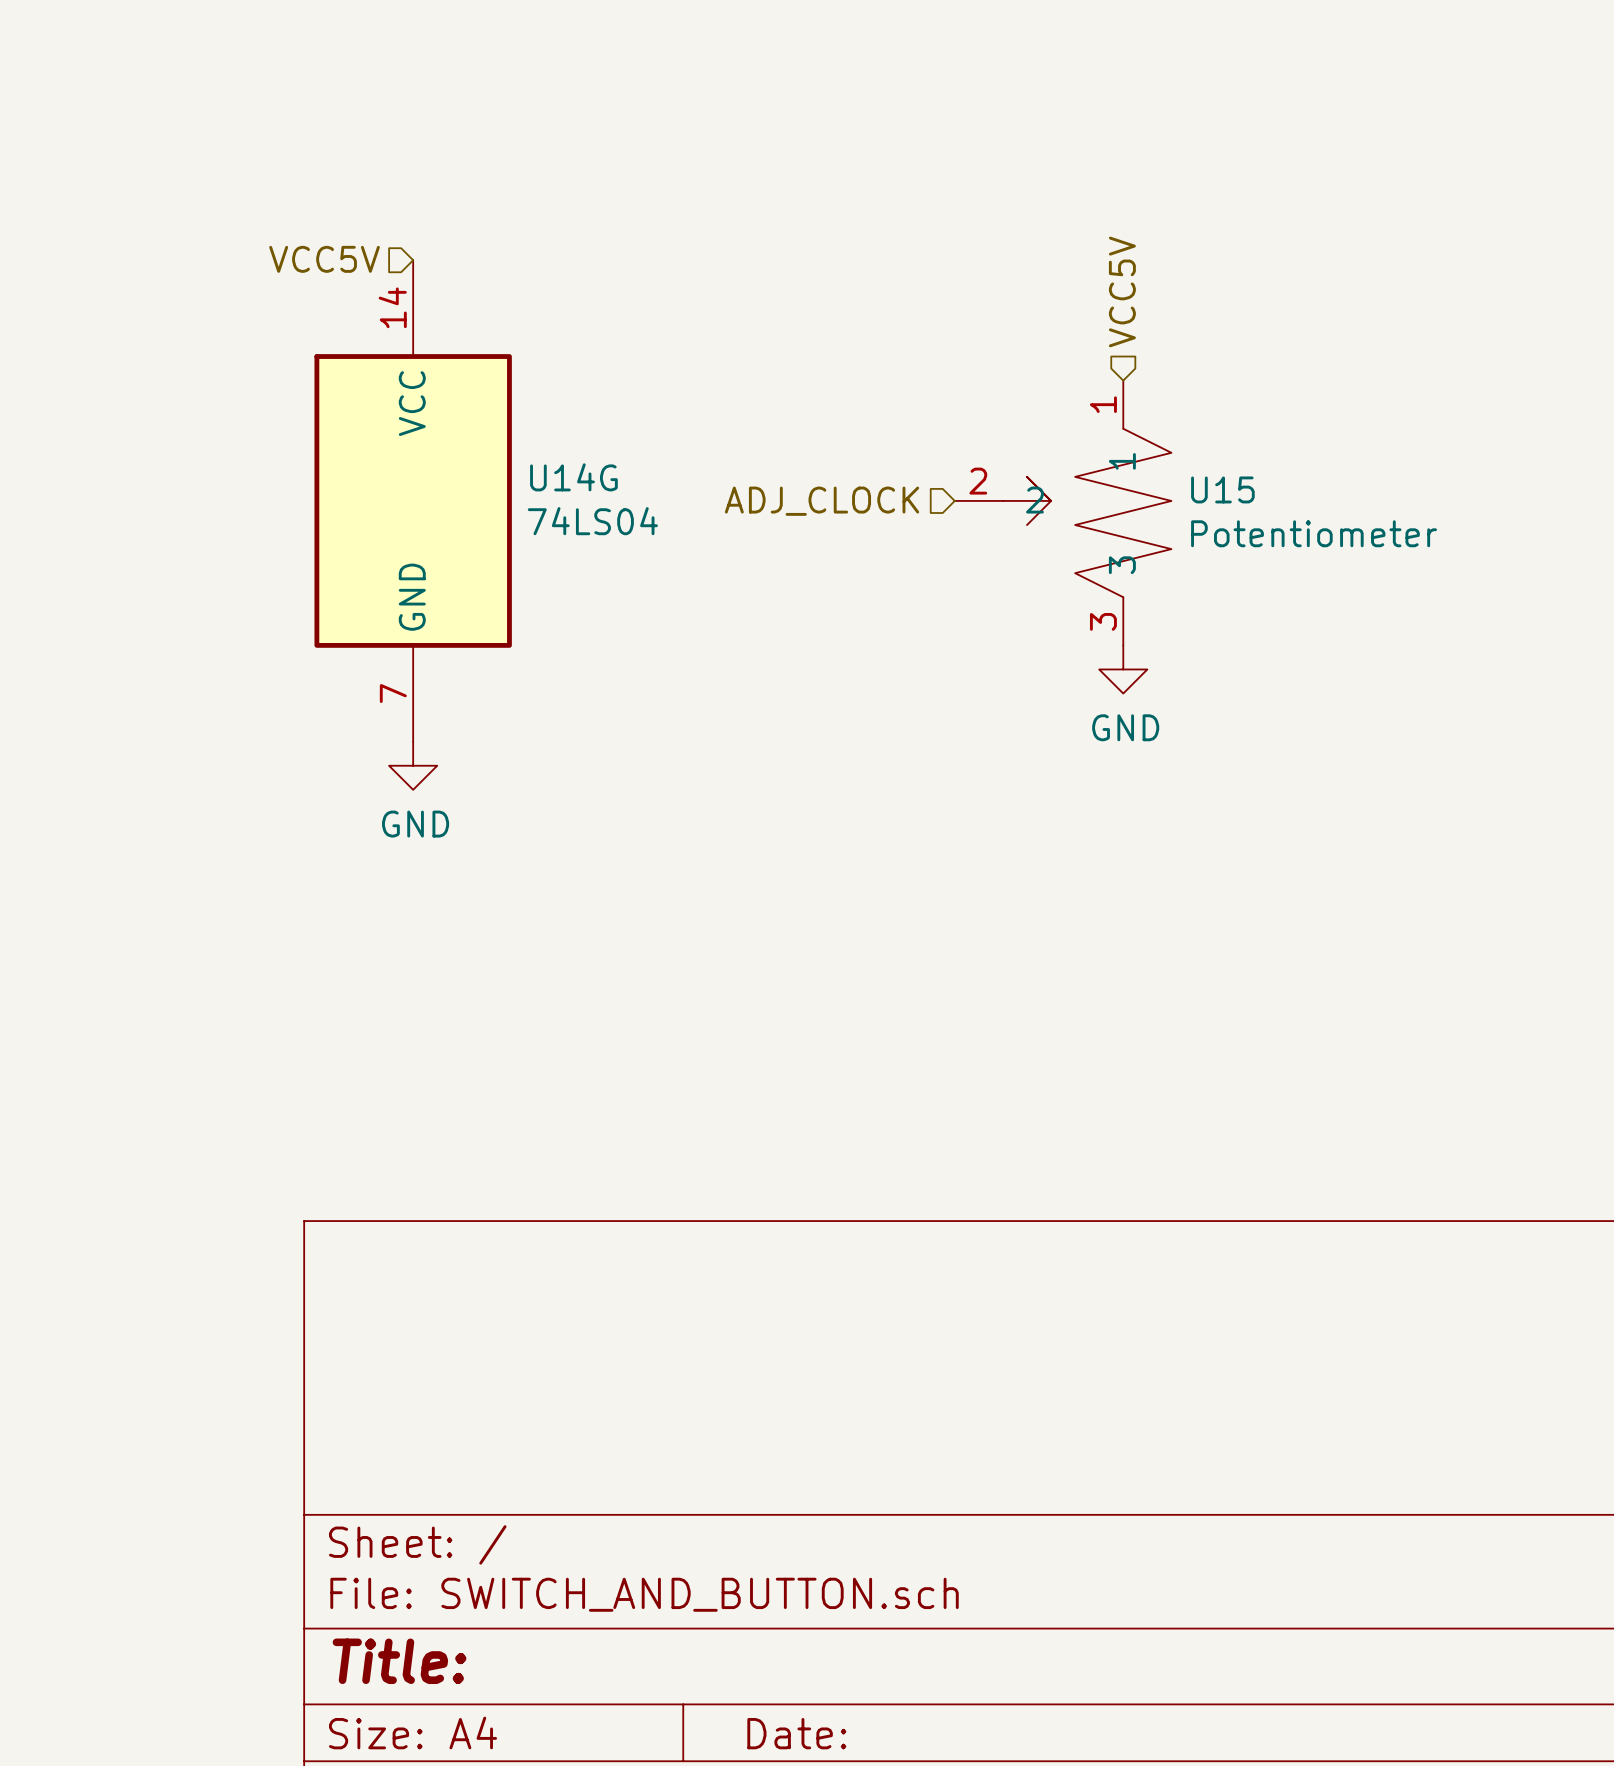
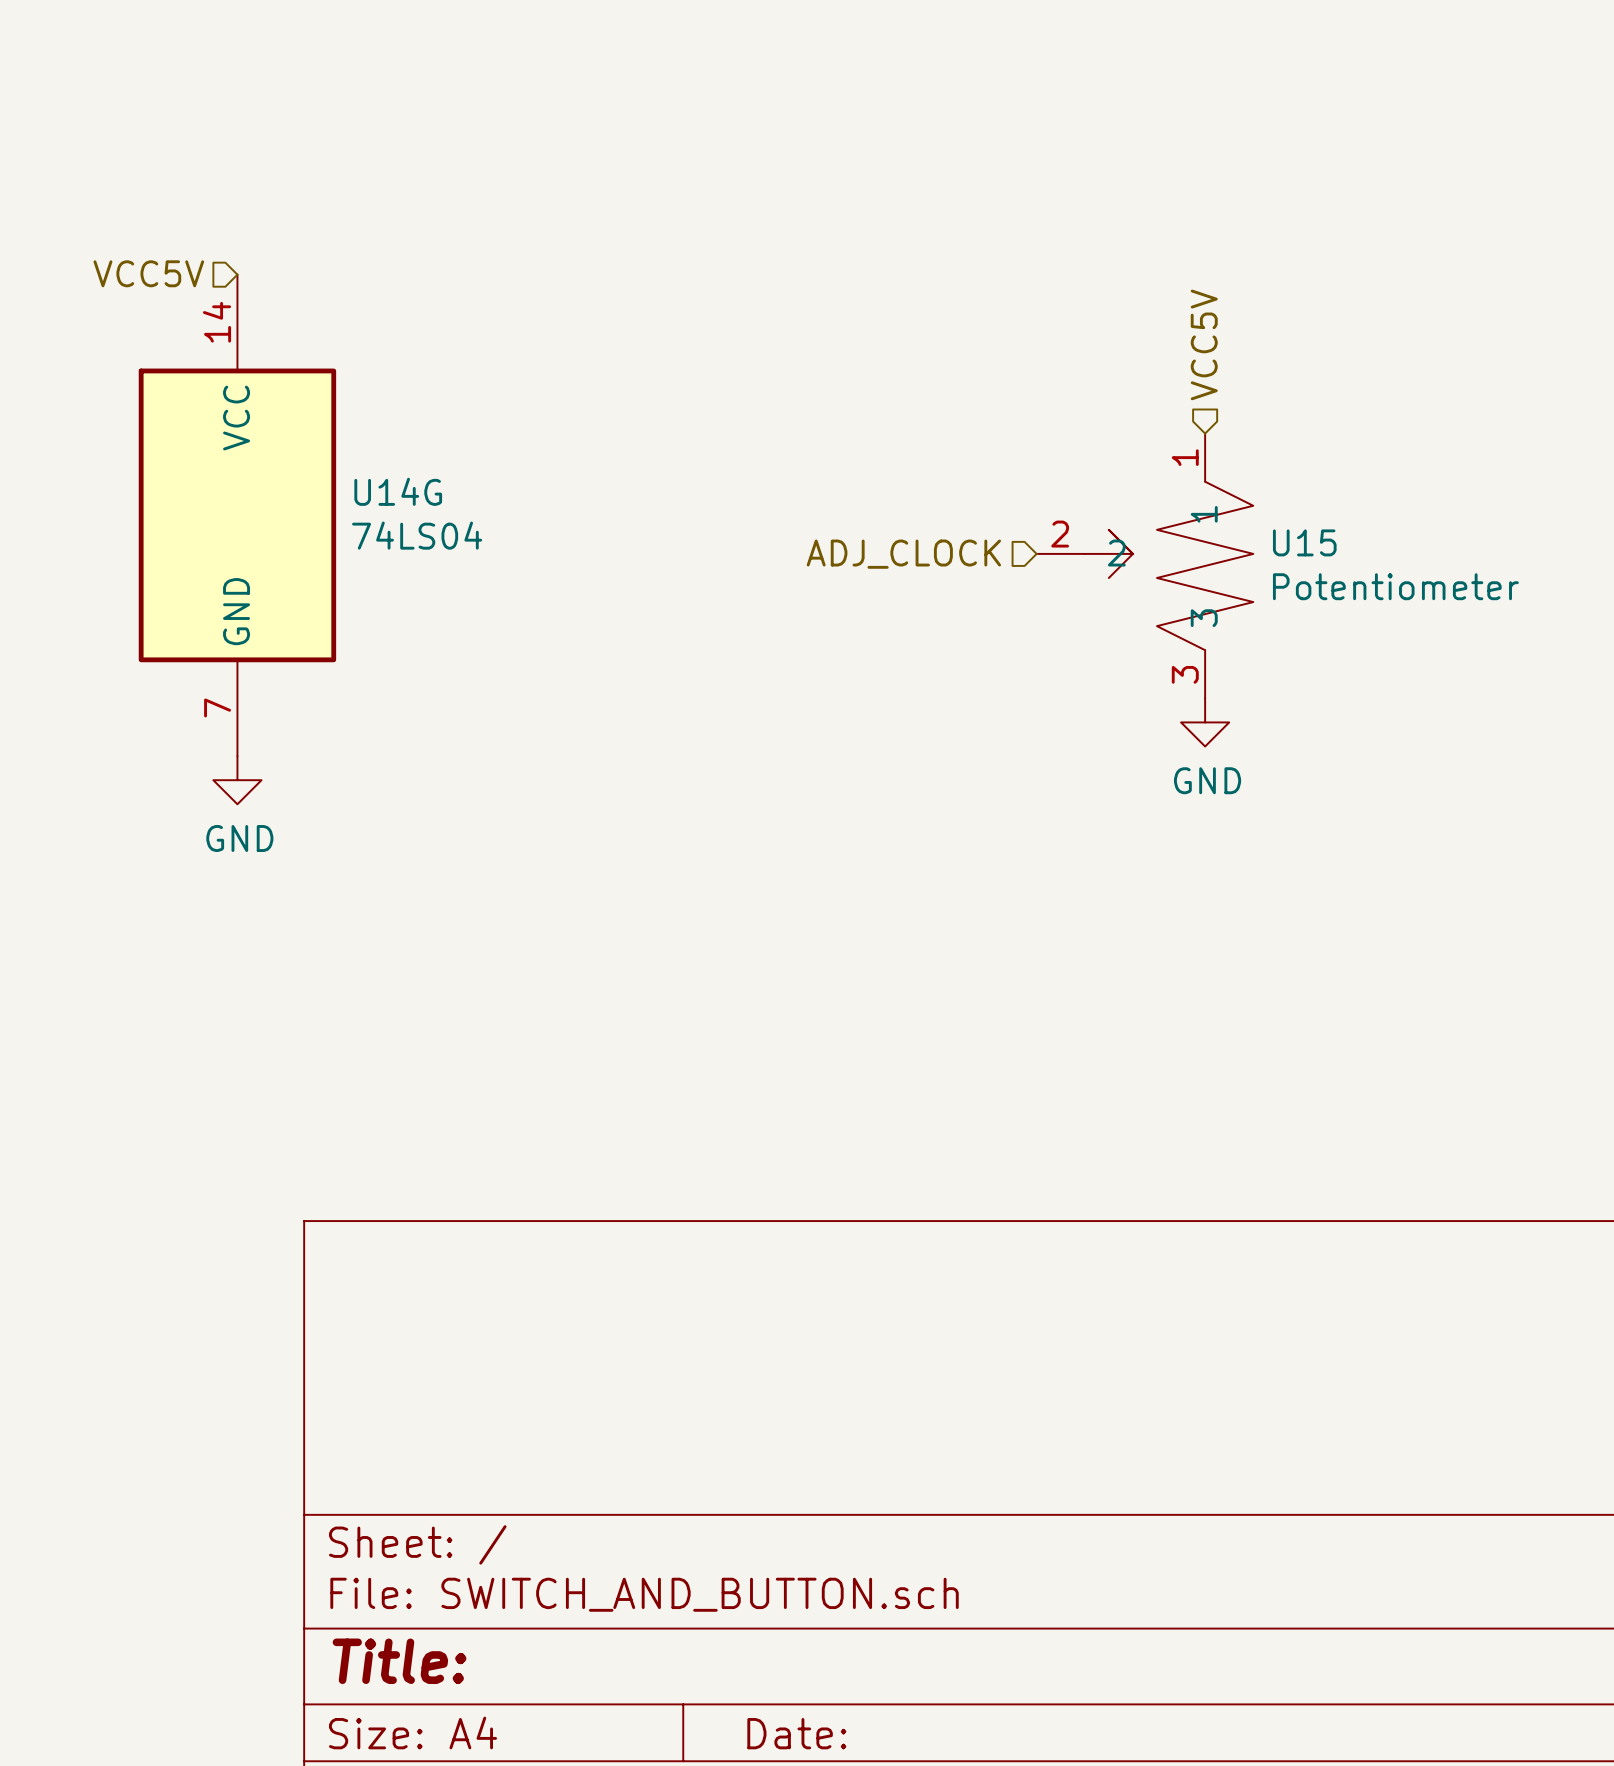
hierarchical label position: VCC5V (324, 259) -> VCC5V (148, 273)
hierarchical label position: VCC5V (1122, 291) -> VCC5V (1204, 344)
U14G position: (413, 500) -> (237, 515)
hierarchical label position: ADJ_CLOCK (822, 501) -> ADJ_CLOCK (903, 554)
U15 position: (1063, 512) -> (1144, 565)
power symbol position: GND (1123, 669) -> GND (1205, 722)
power symbol position: GND (413, 765) -> GND (237, 780)

